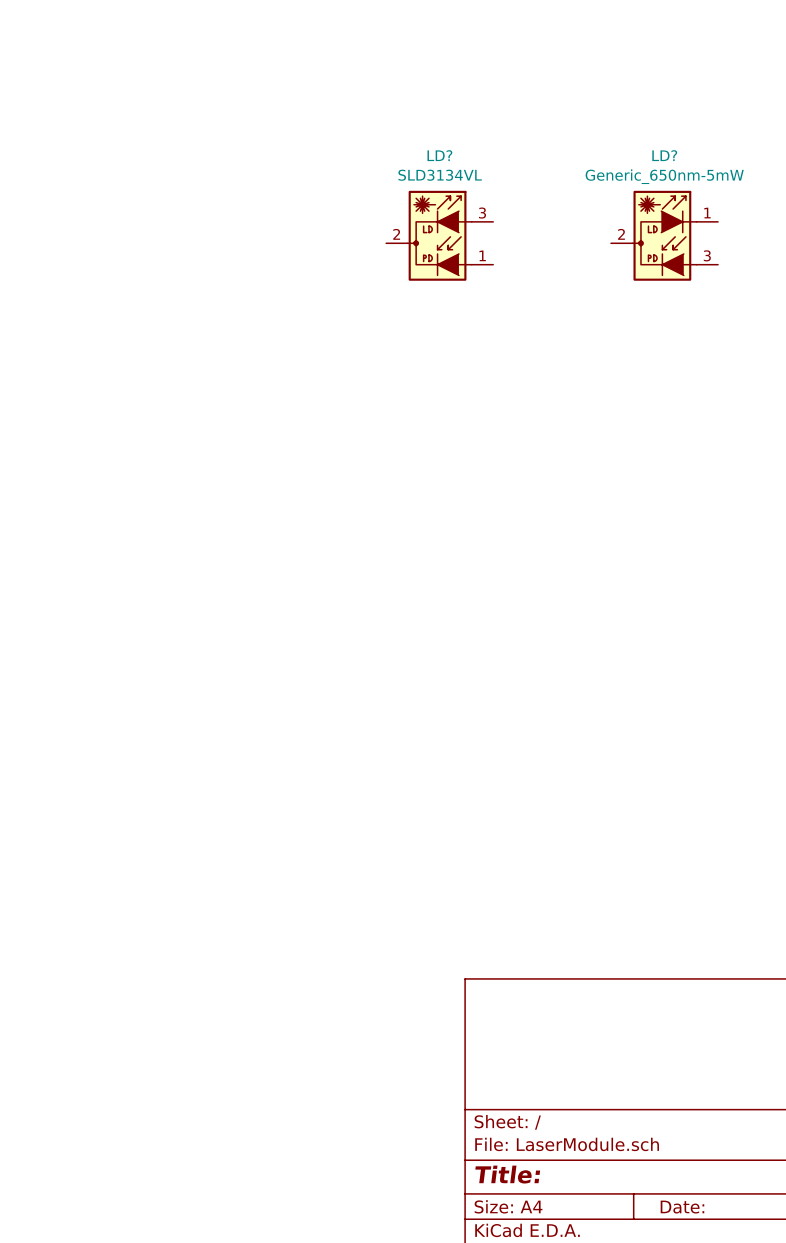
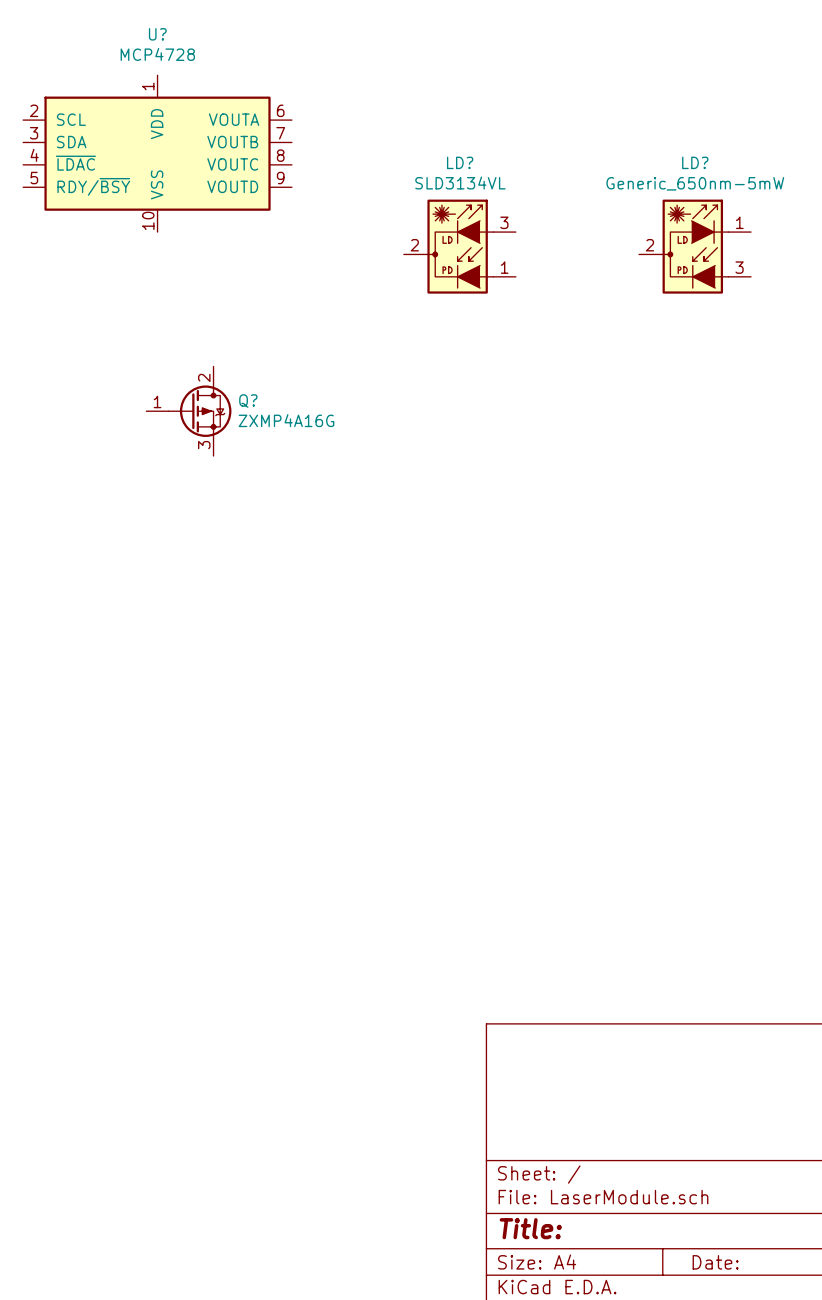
U?: none -> MCP4728 (157, 153)
Q?: none -> ZXMP4A16G (188, 411)

